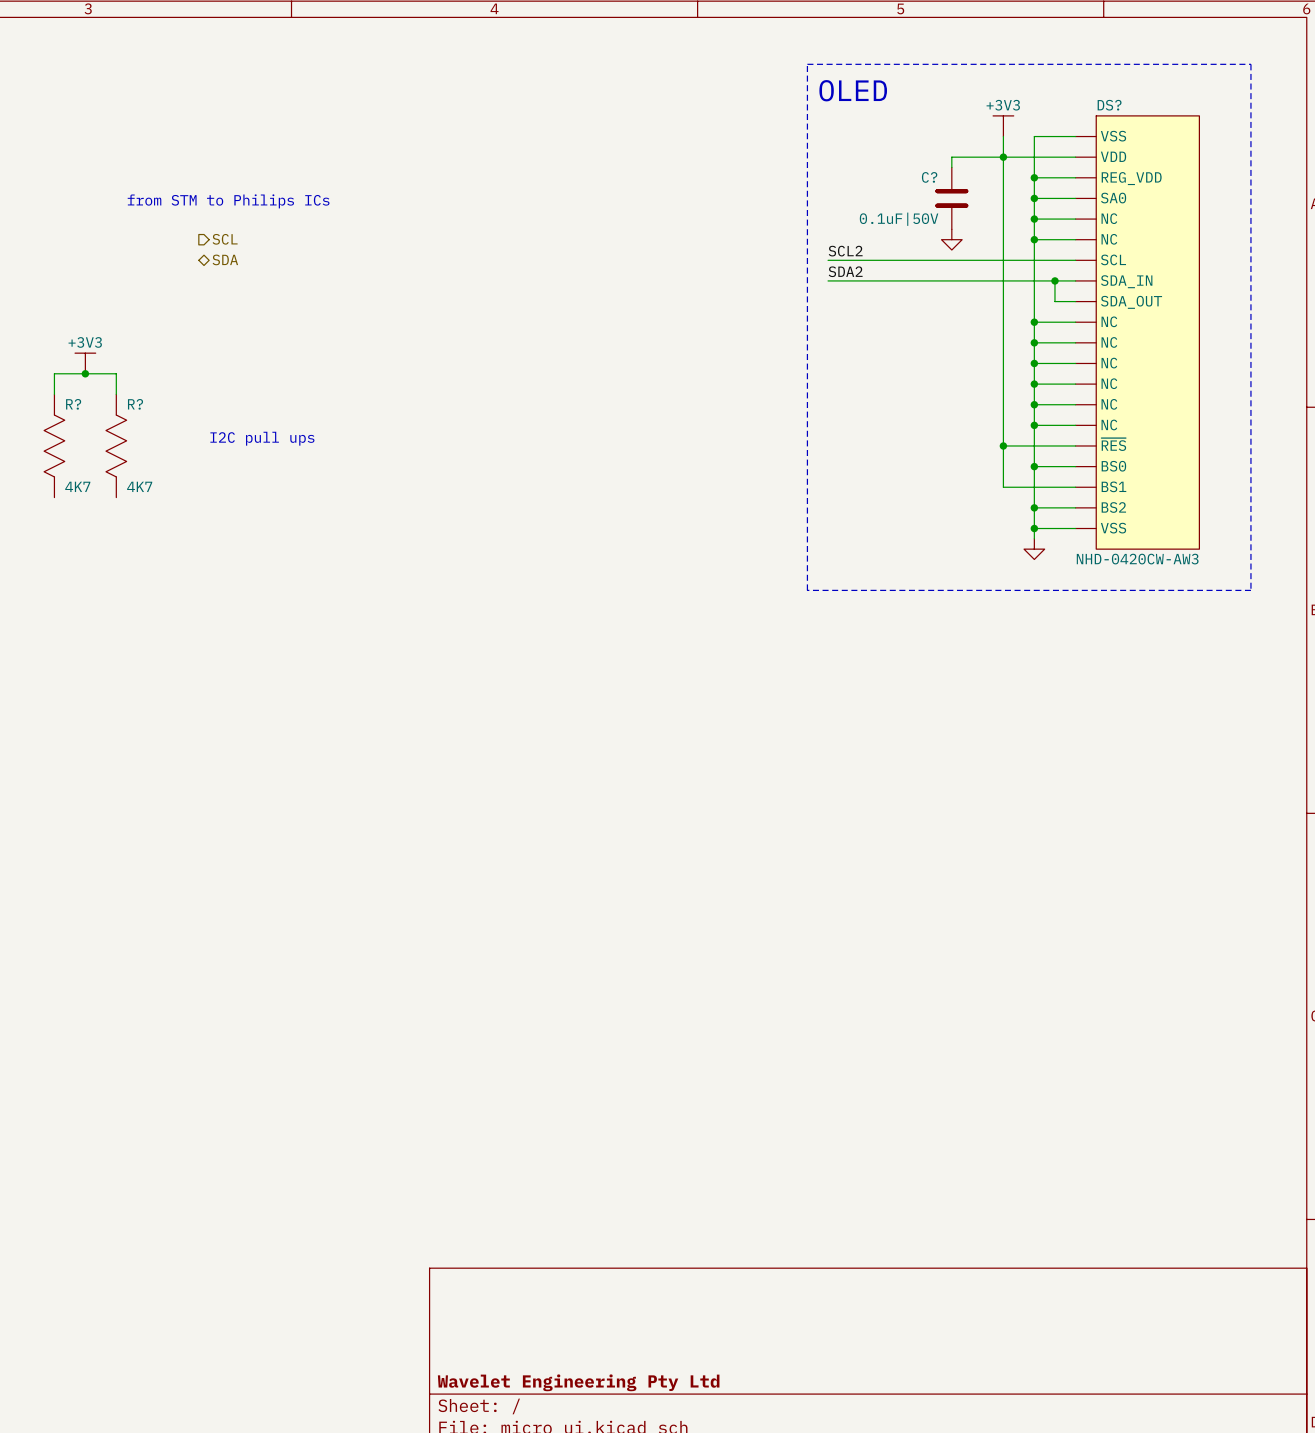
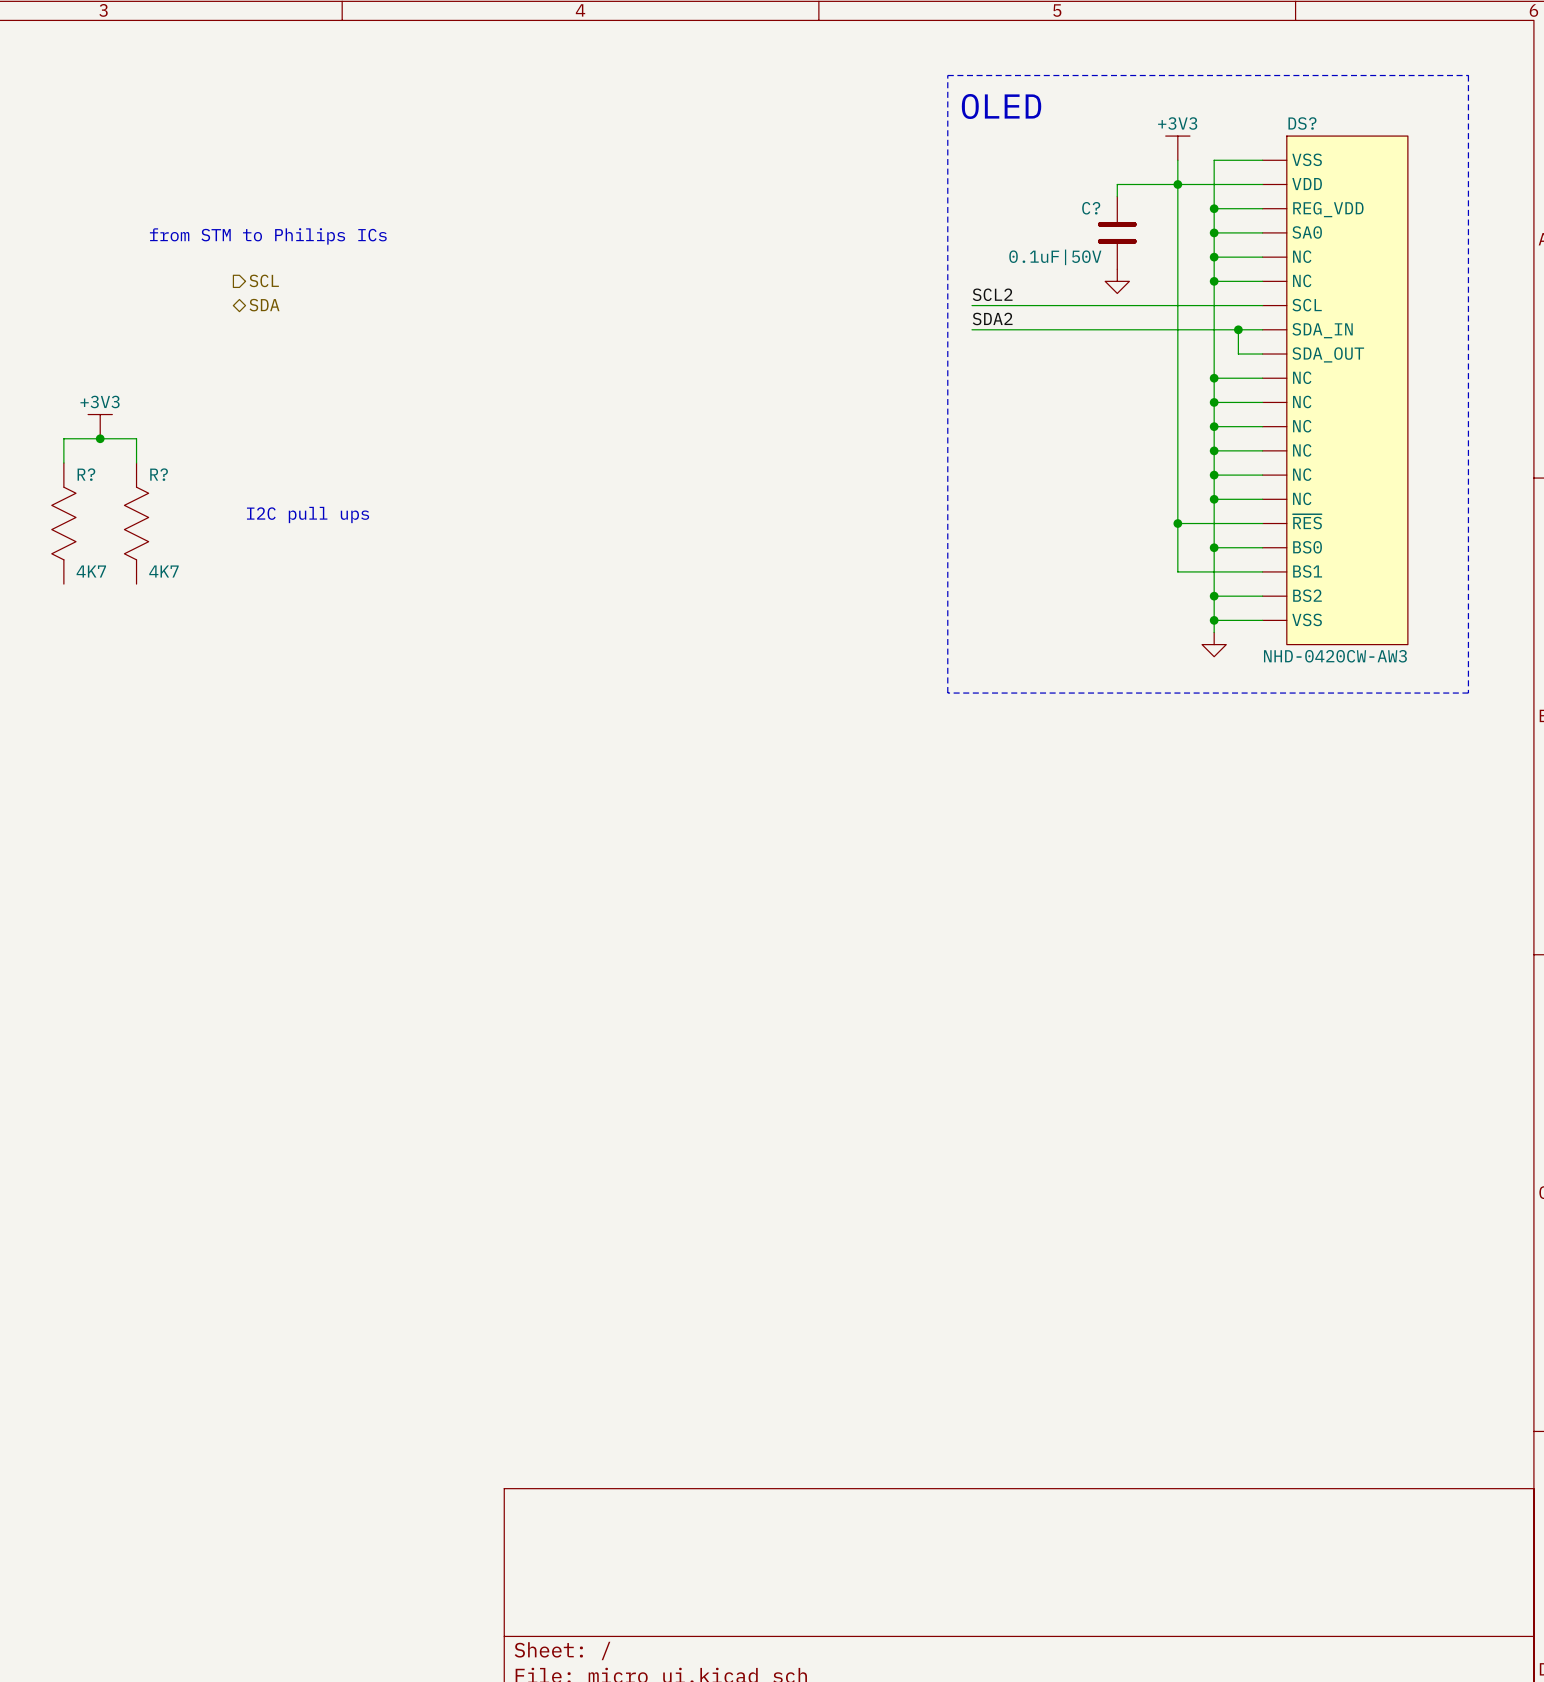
title block: Wavelet Engineering Pty Ltd (578, 1382) -> none

